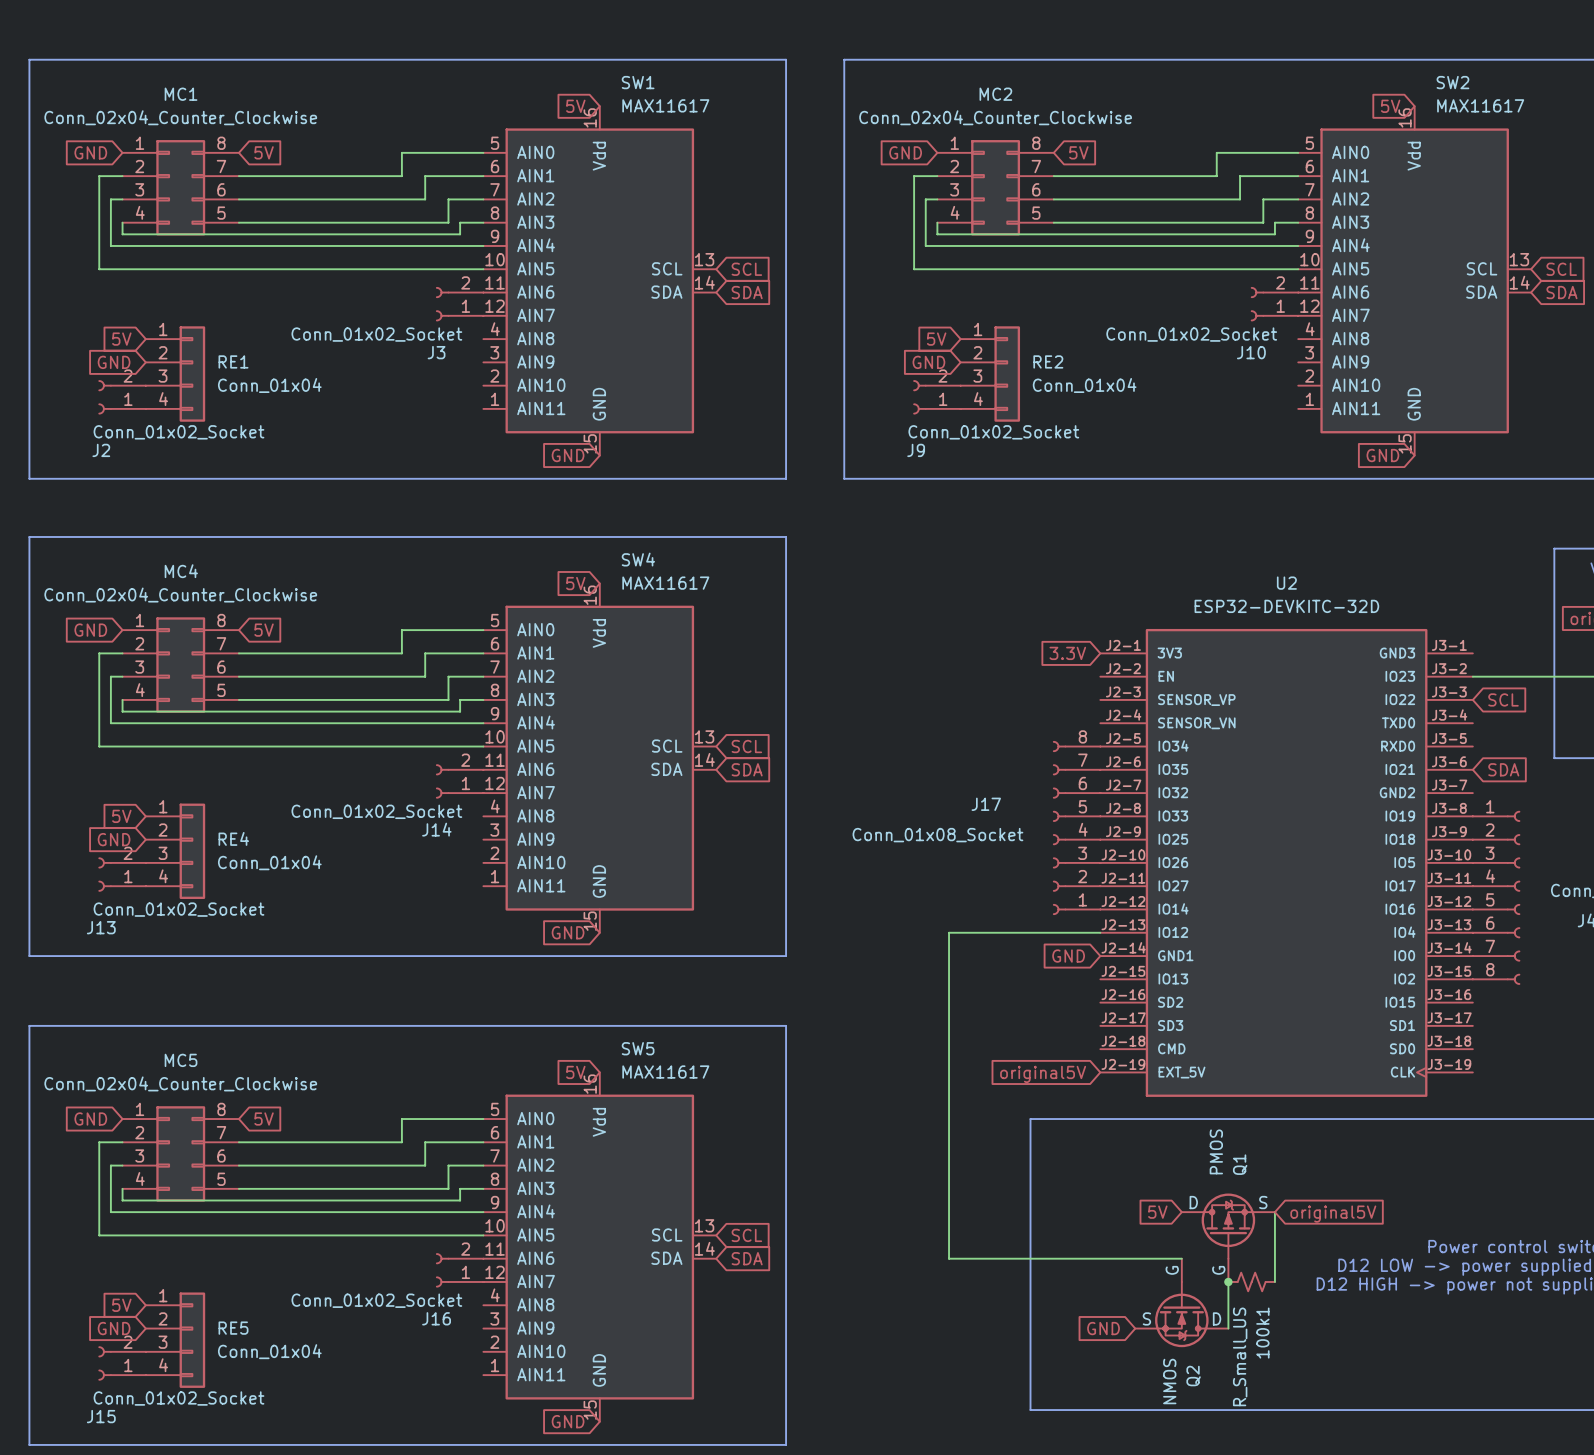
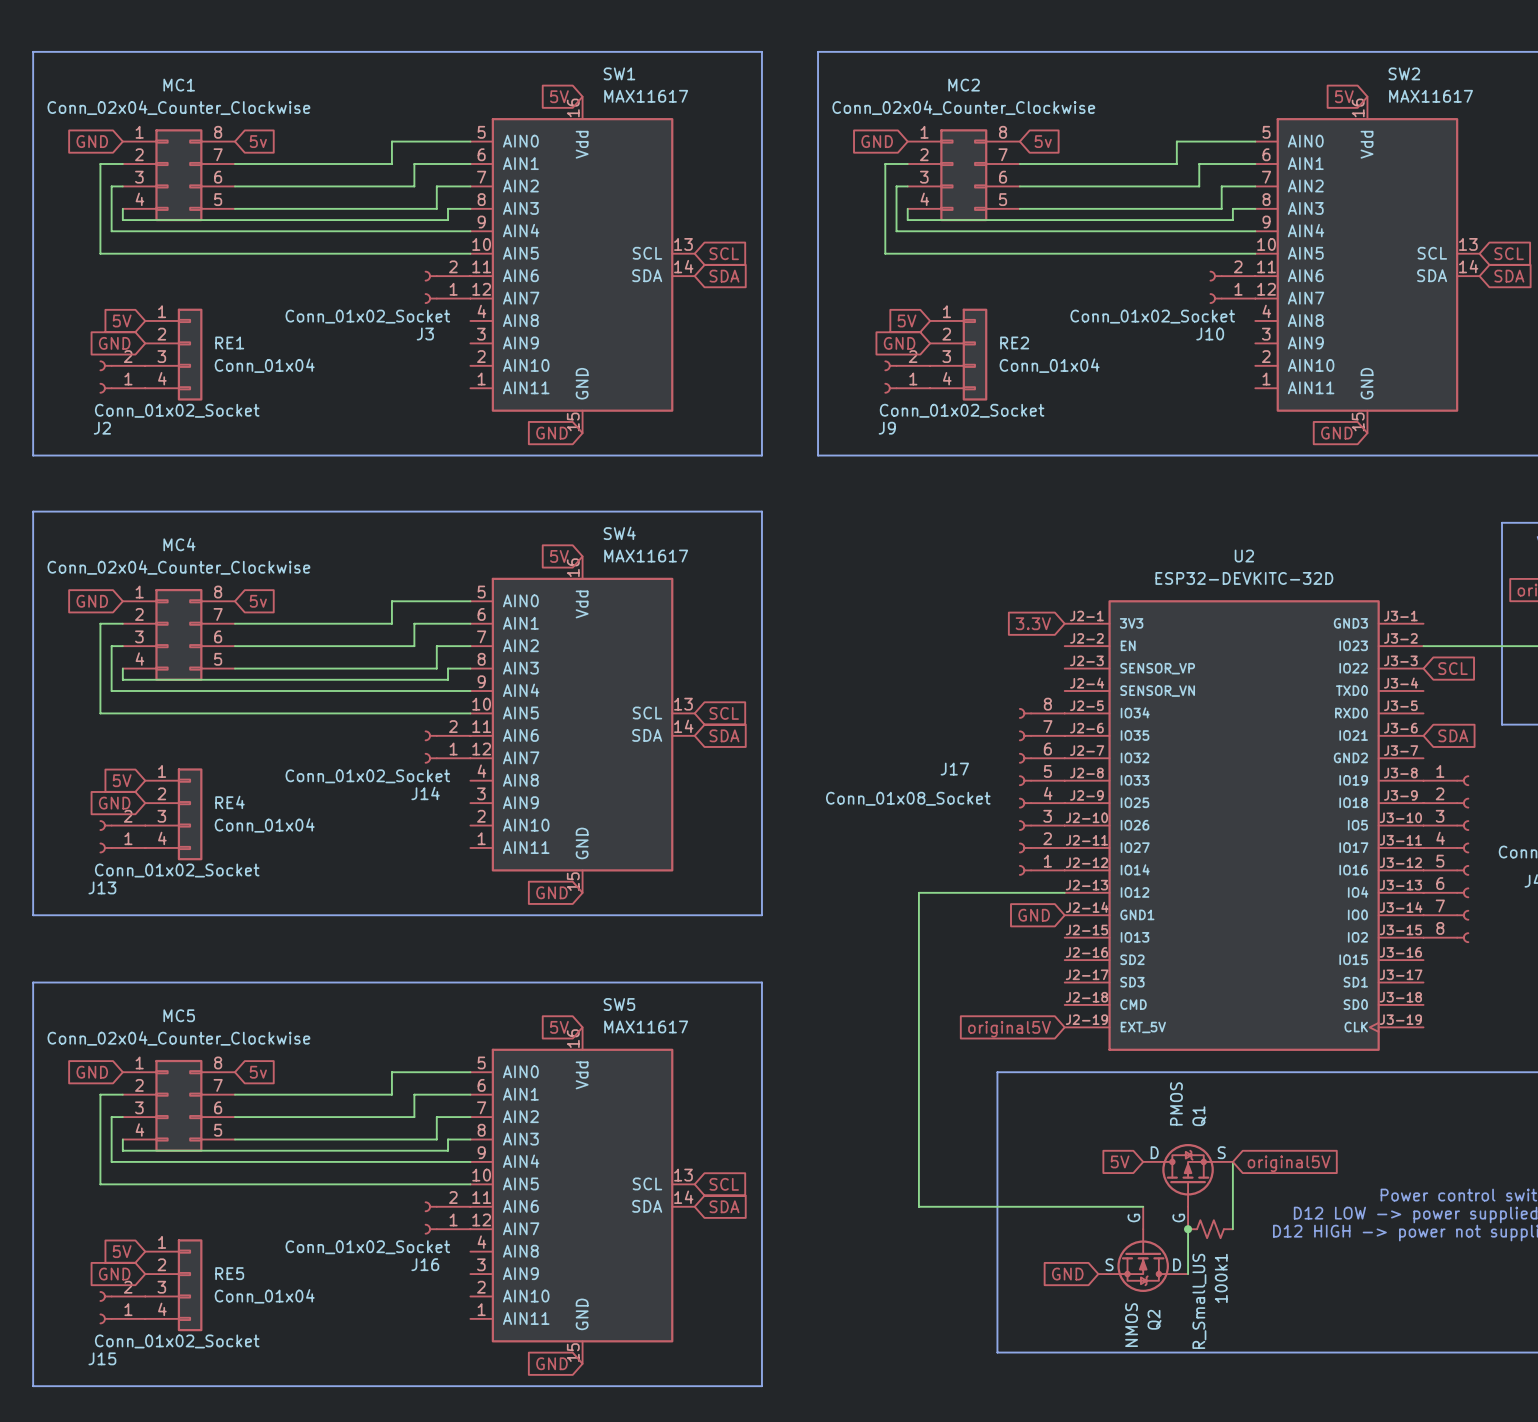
global label: 5V (264, 152) -> 5v (258, 141)
global label: 5V (1078, 152) -> 5v (1043, 141)
global label: 5V (264, 630) -> 5v (258, 601)
global label: 5V (264, 1119) -> 5v (258, 1072)

